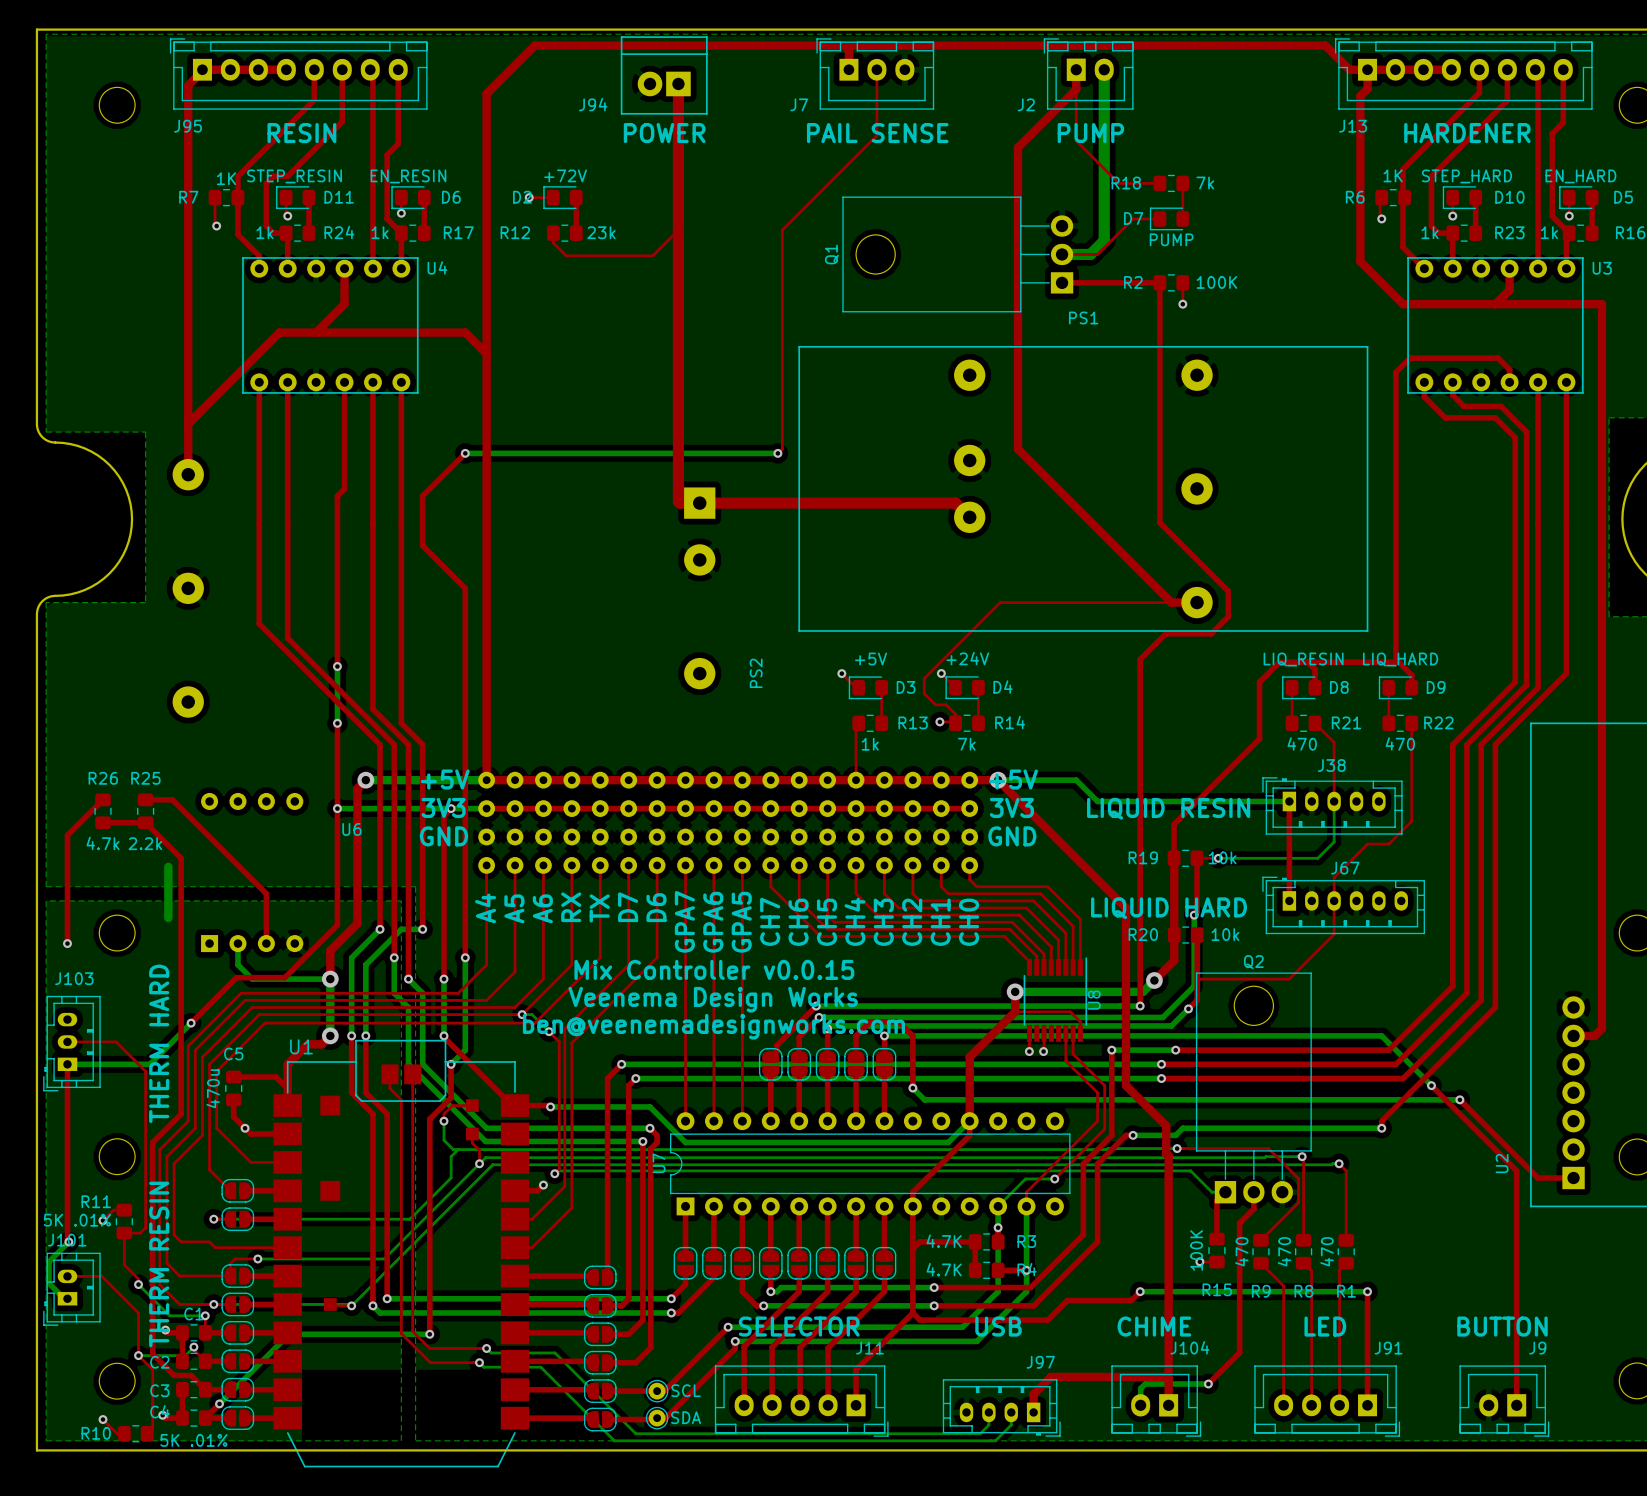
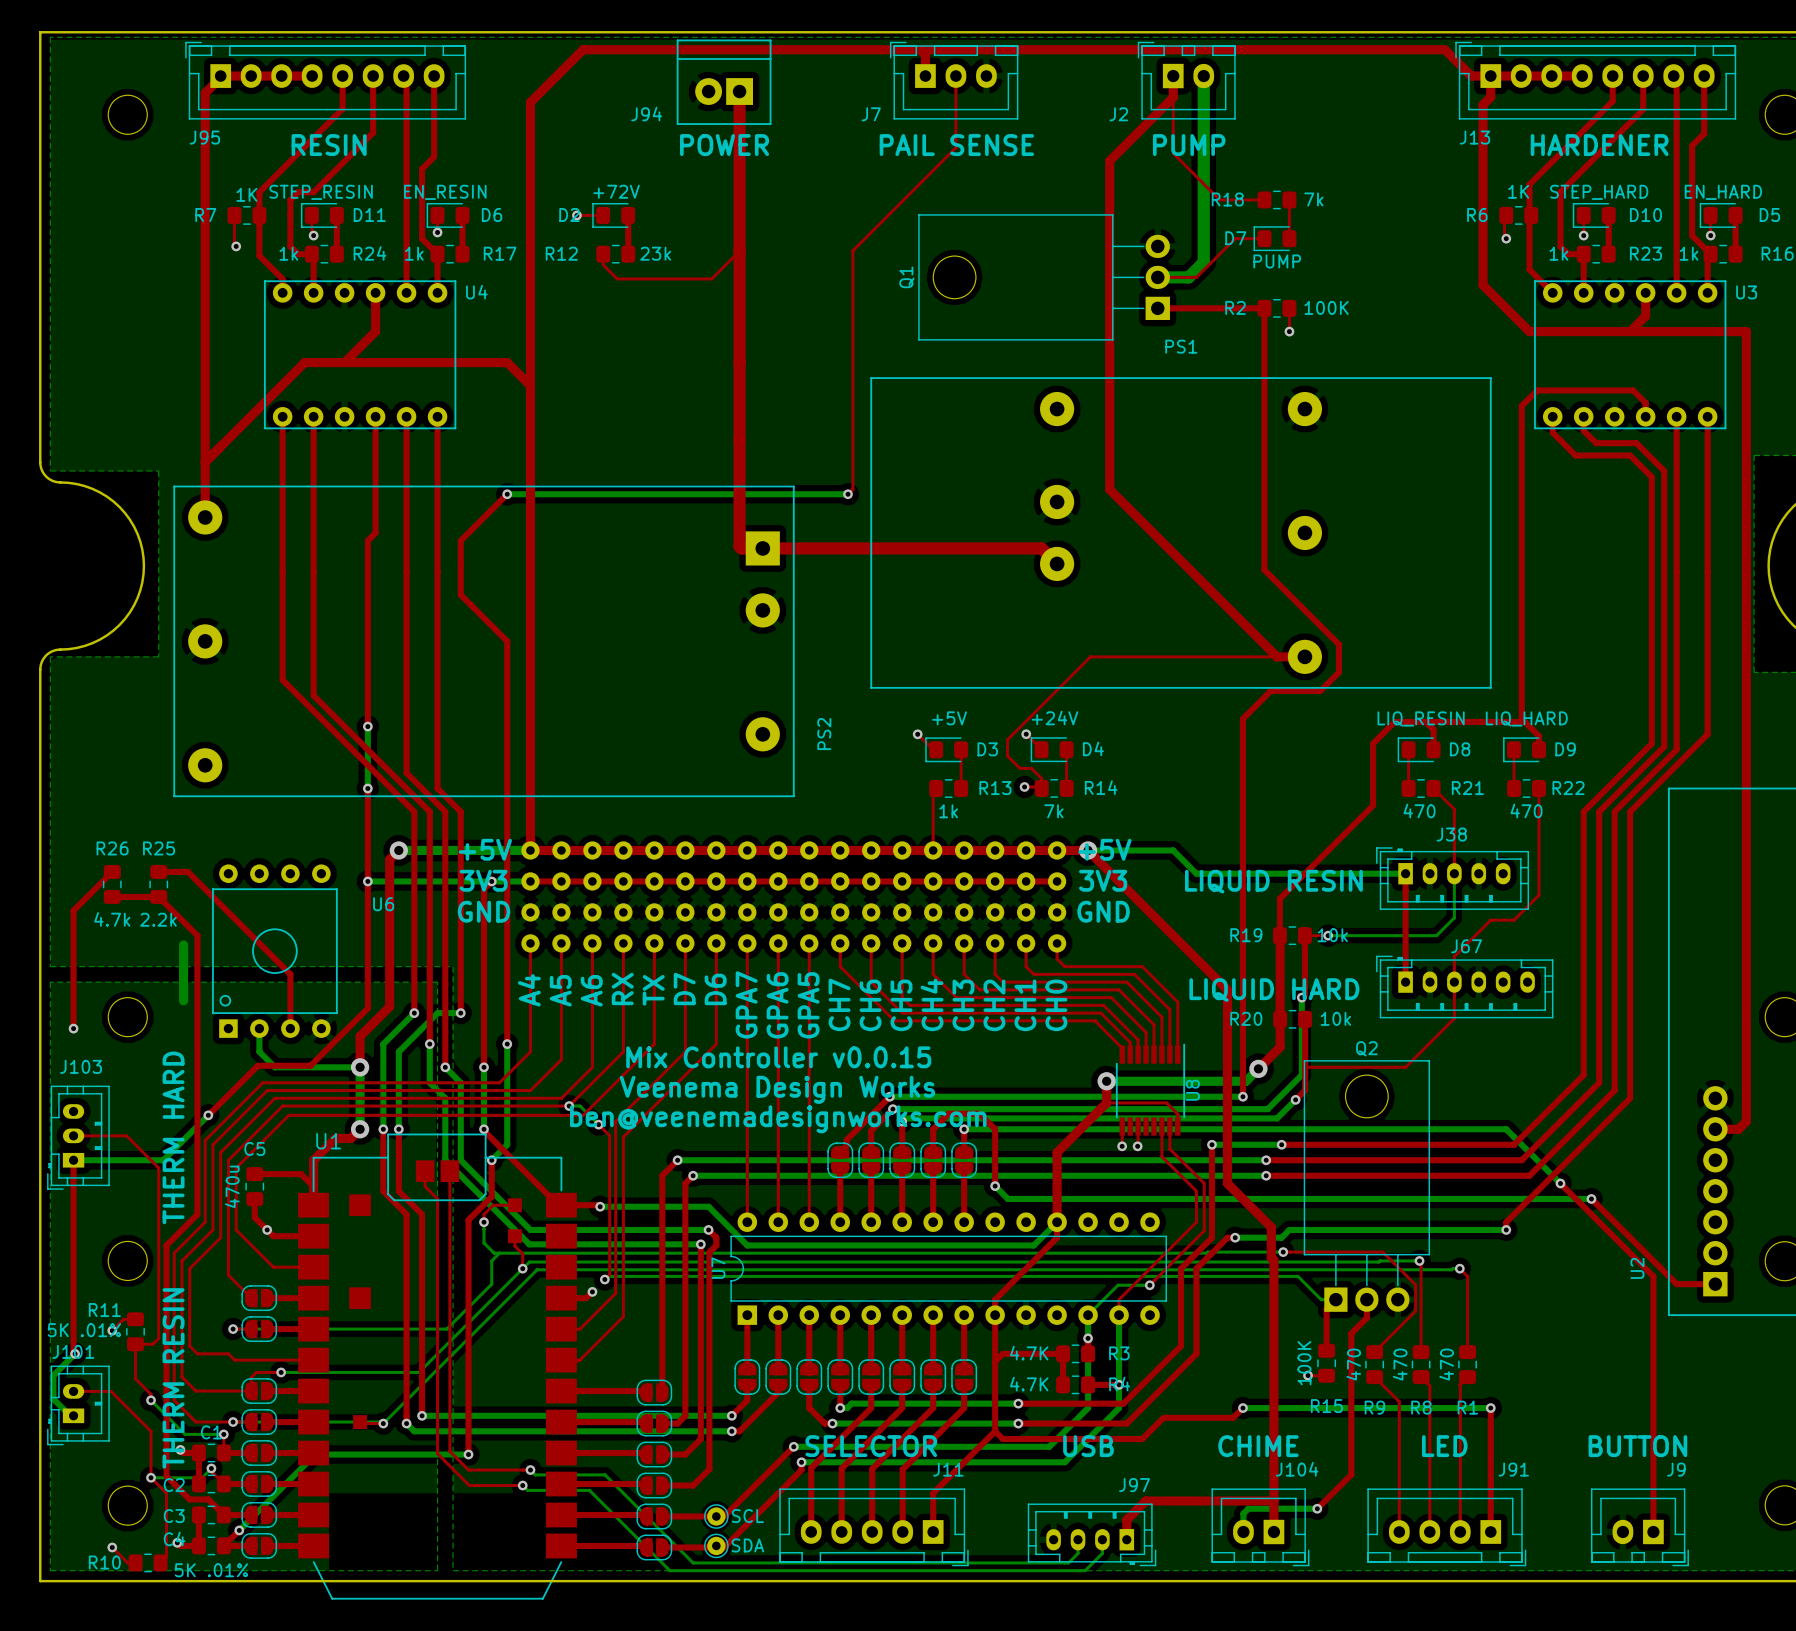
PS2 footprint: [172, 459, 716, 718] -> [173, 485, 795, 798]
U6 footprint: [201, 792, 304, 953] -> [212, 864, 338, 1038]

